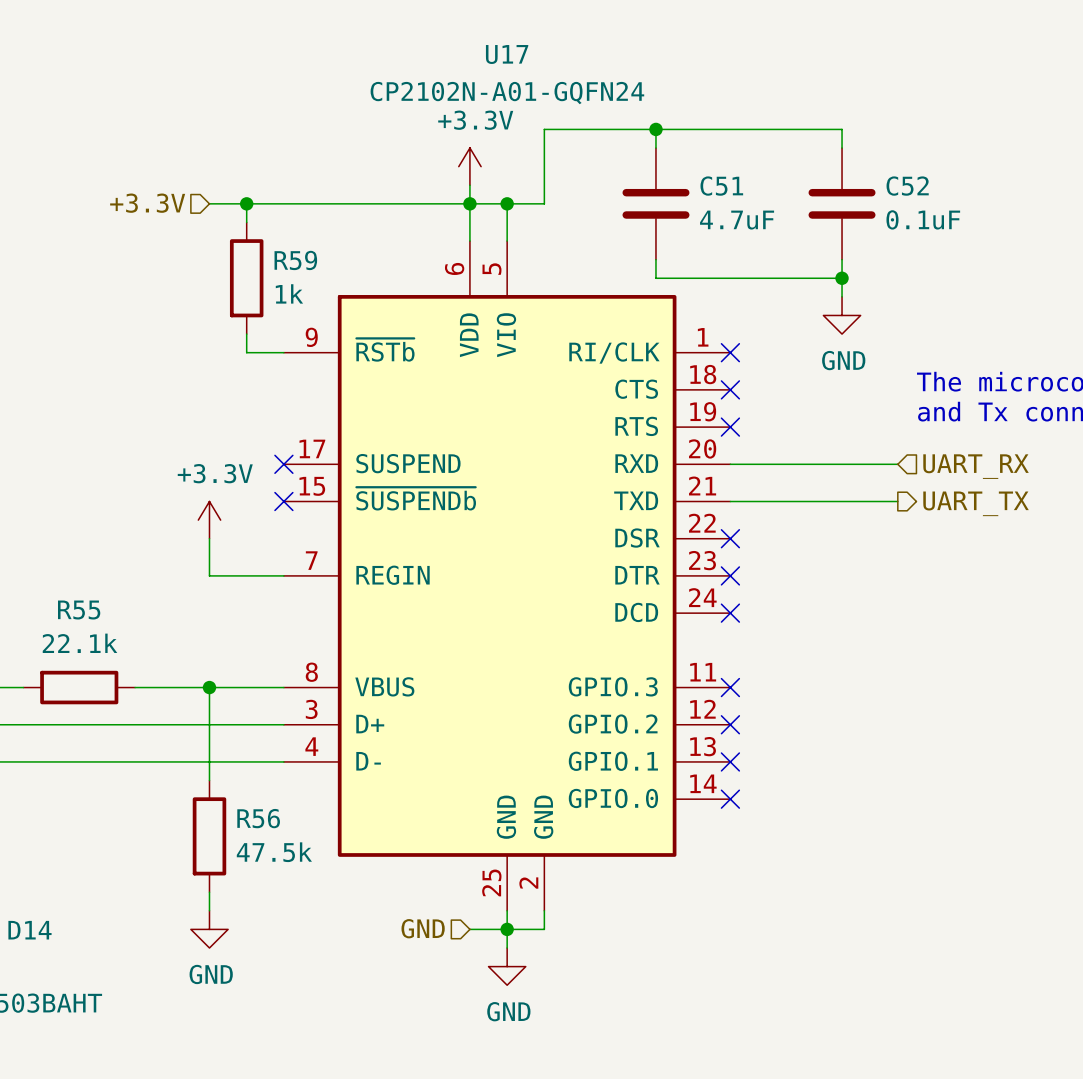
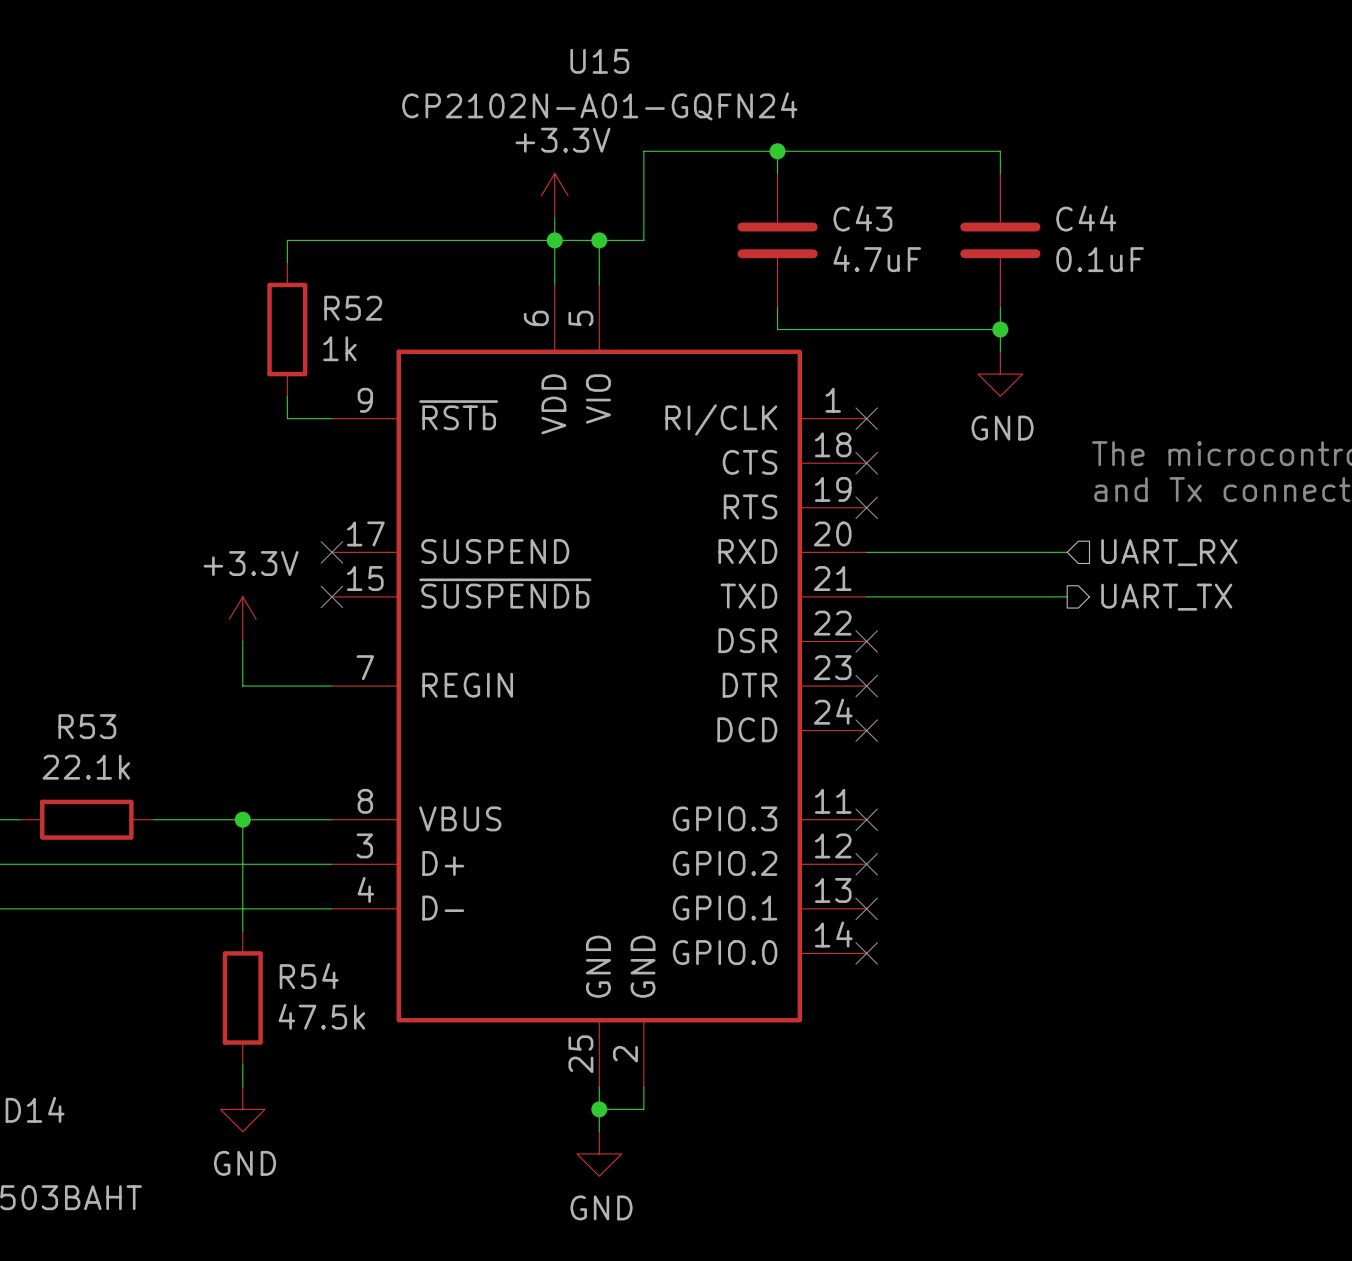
U17 name: U17 (507, 54) -> U15 (599, 61)
C51 name: C51 (721, 186) -> C43 (862, 218)
C52 name: C52 (907, 186) -> C44 (1086, 218)
hierarchical label: +3.3V (147, 203) -> none
wire: (209, 203) (246, 203) -> none
junction: (246, 203) -> none
R59 name: R59 (295, 260) -> R52 (353, 308)
R55 name: R55 (79, 610) -> R53 (87, 726)
R56 name: R56 (258, 818) -> R54 (309, 976)
hierarchical label: GND (423, 928) -> none
wire: (469, 929) (507, 929) -> none

